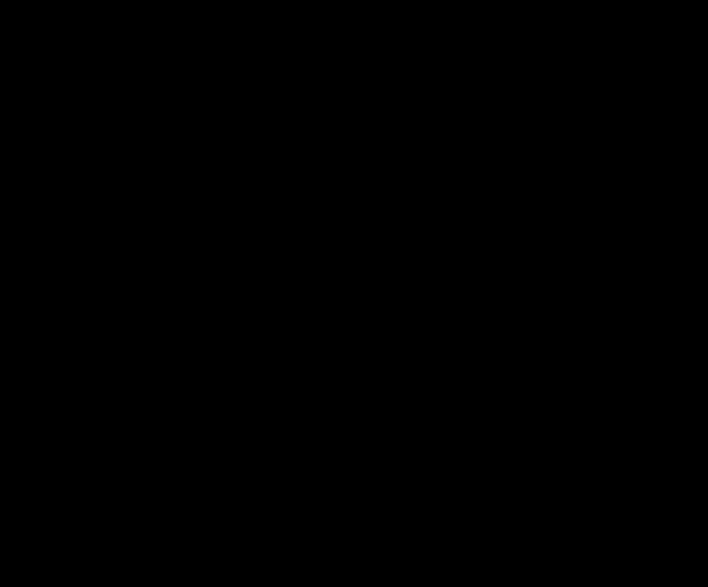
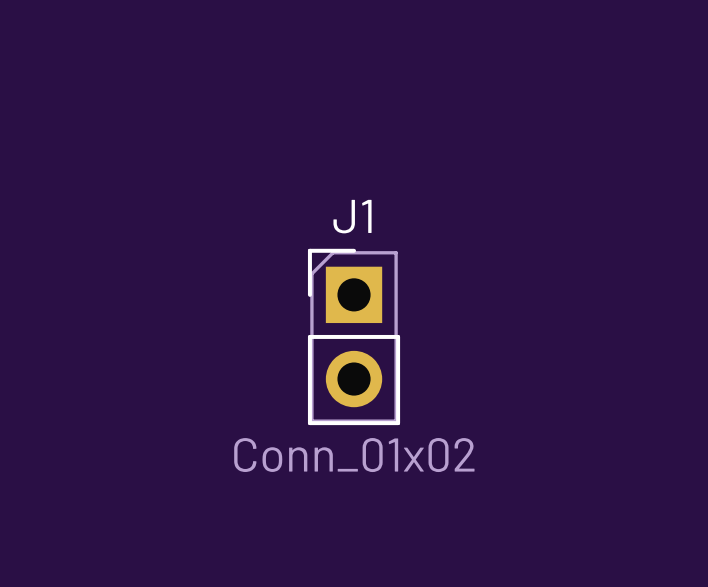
J1: none -> Conn_01x02 (354, 336)

